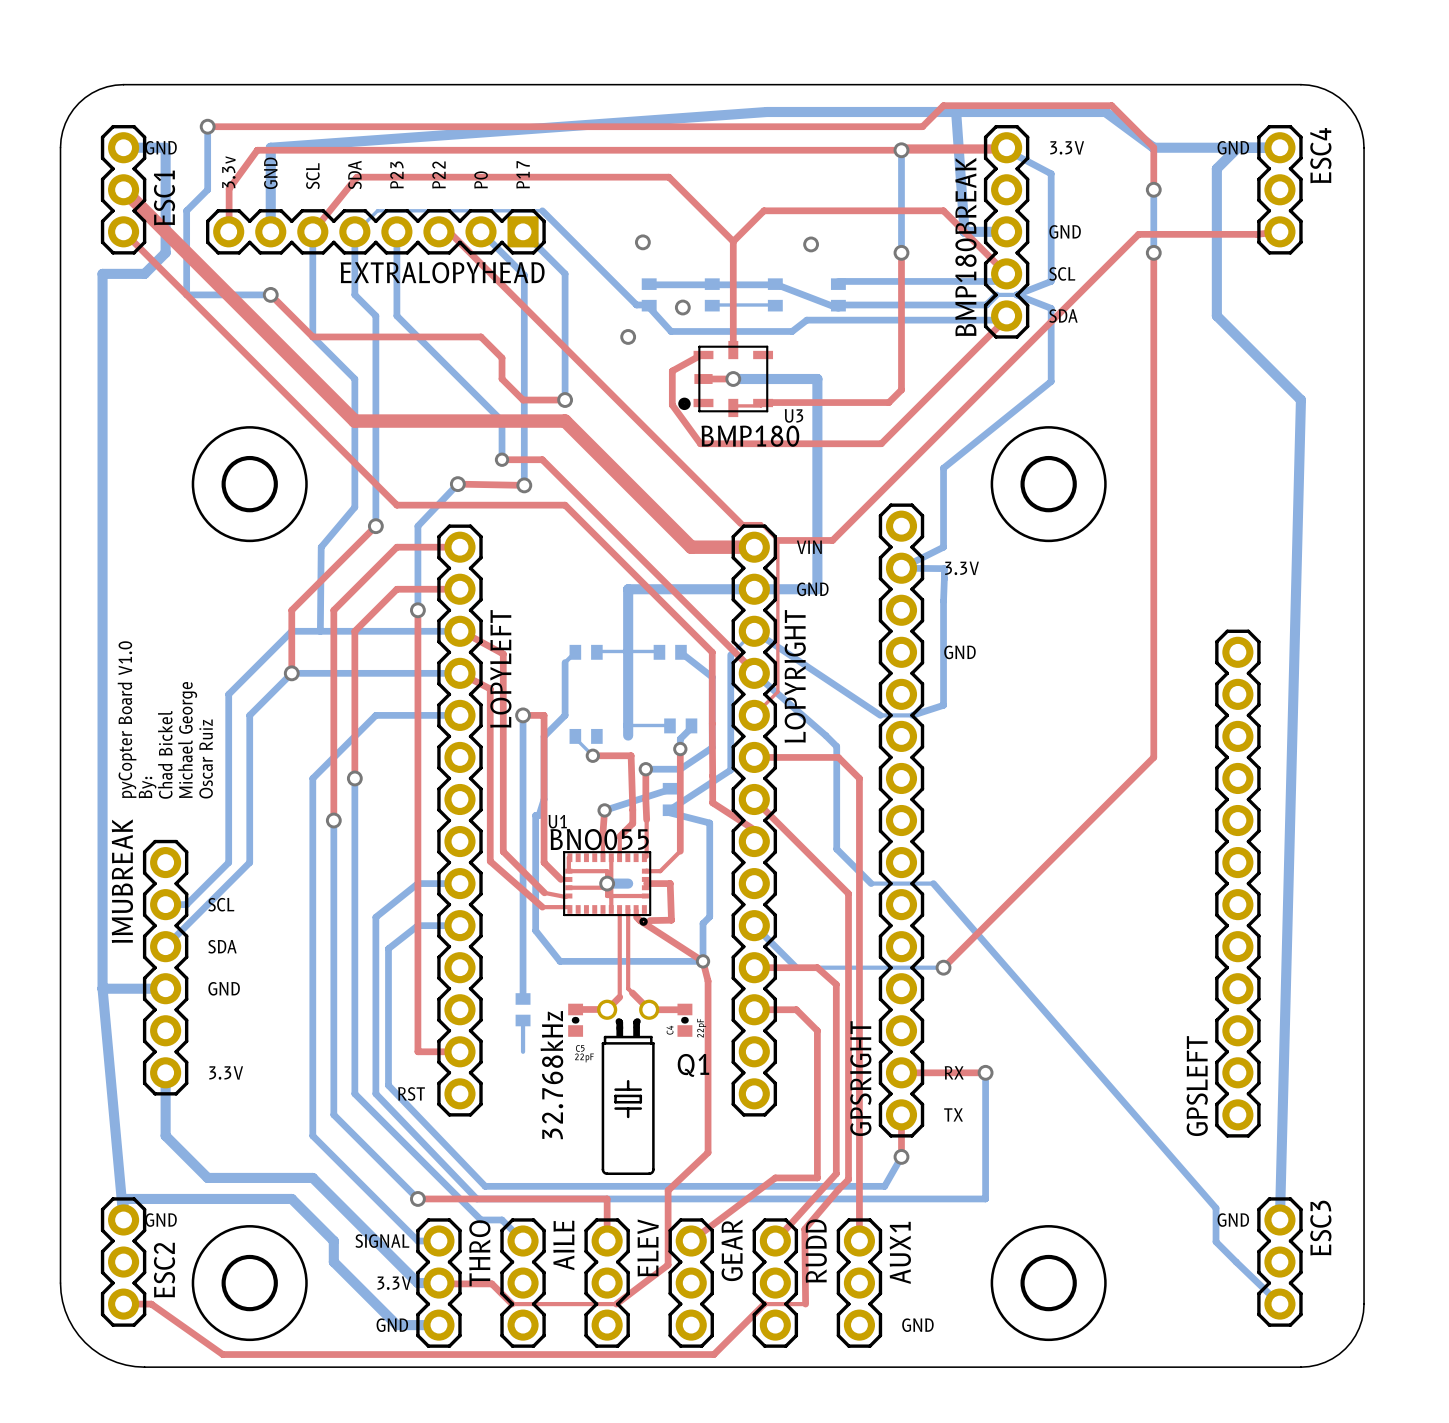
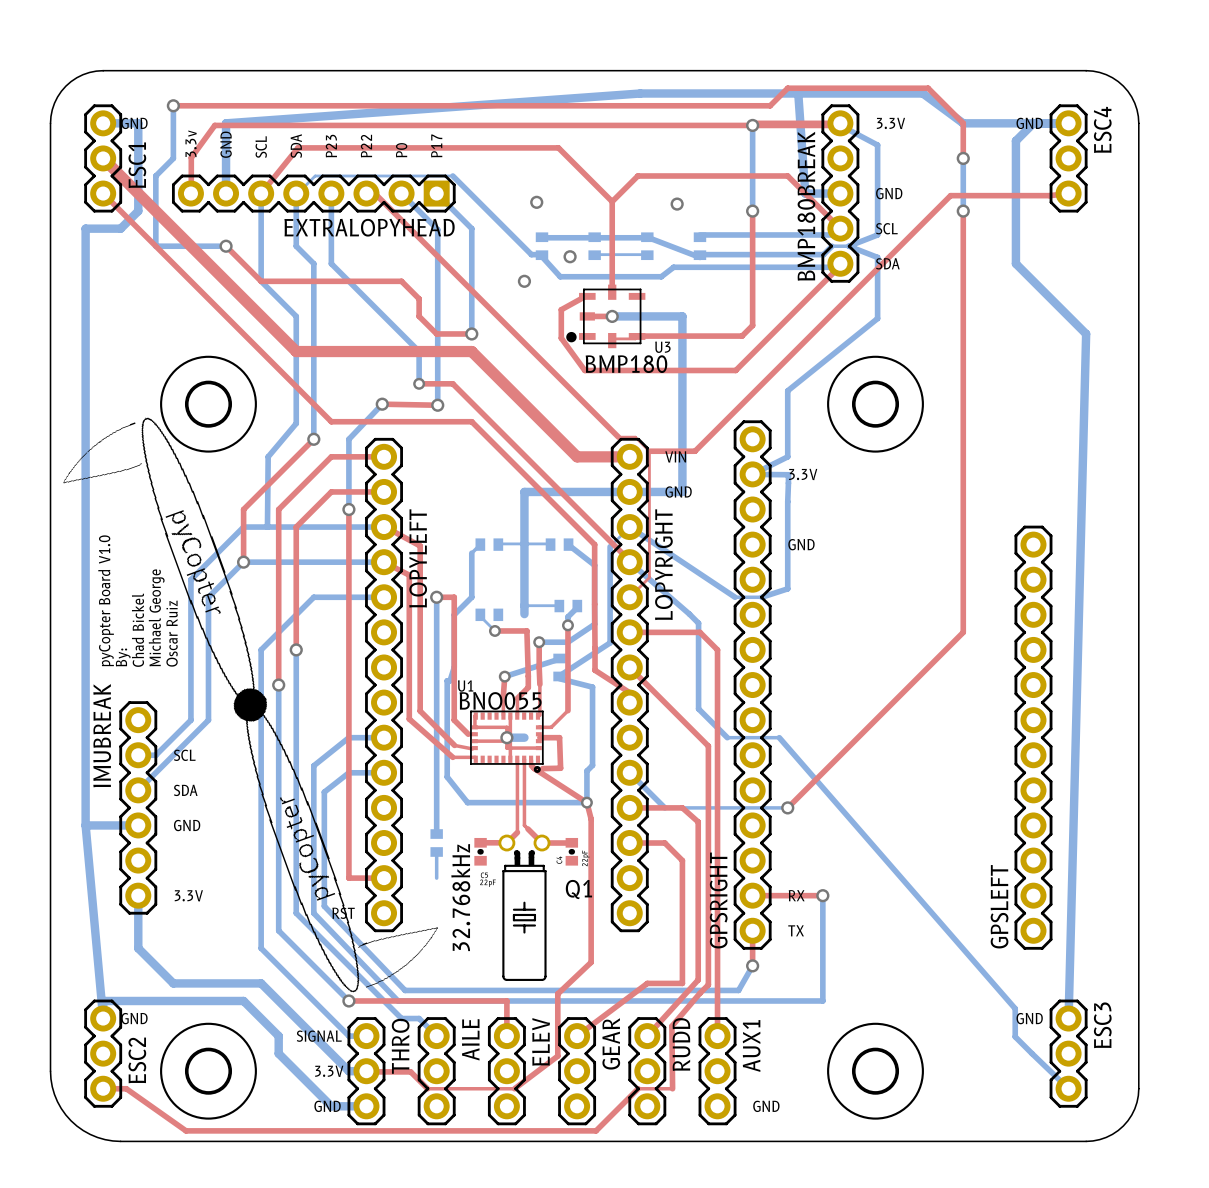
drawing: none -> [63, 417, 439, 993]

